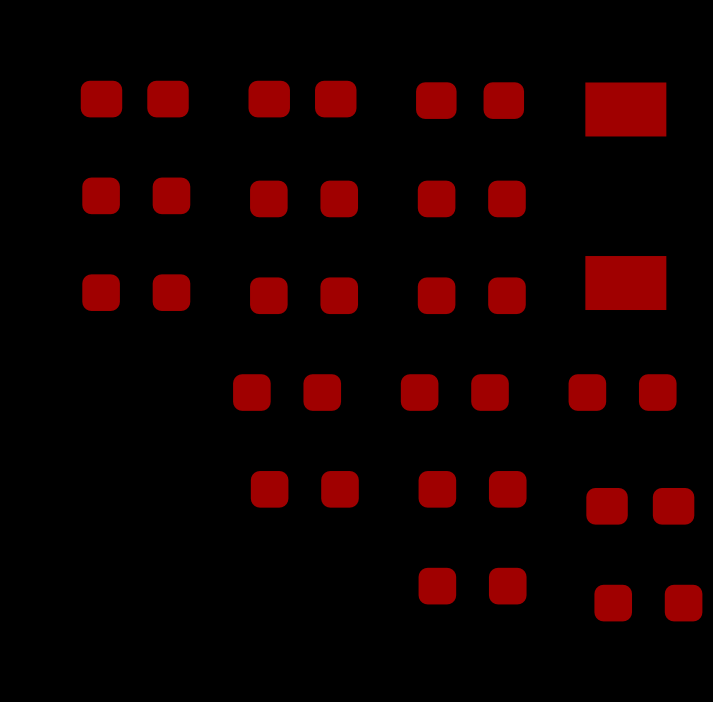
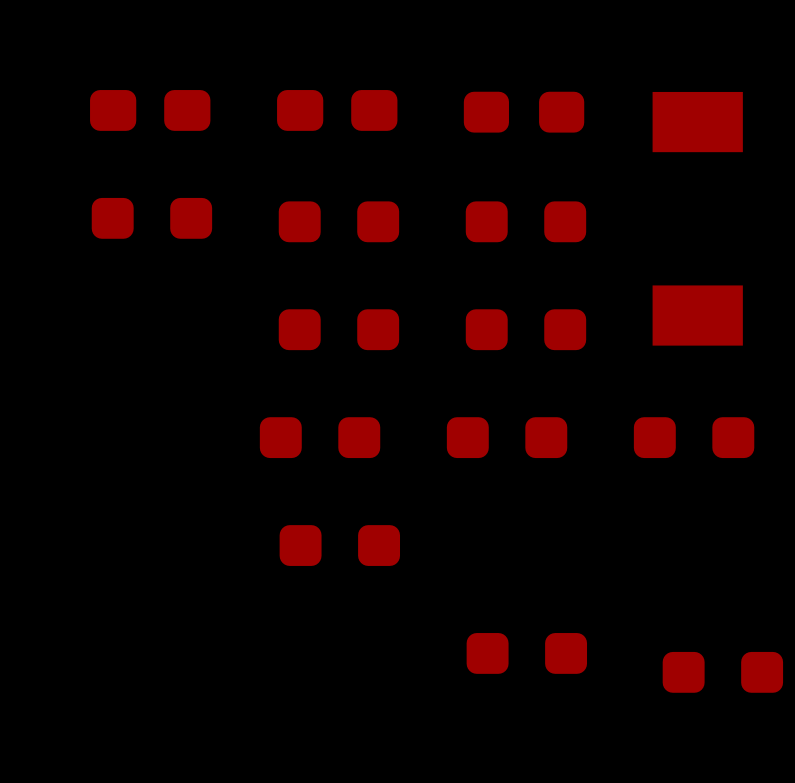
part: (136, 292) -> none
part: (472, 489) -> none
part: (640, 506) -> none

